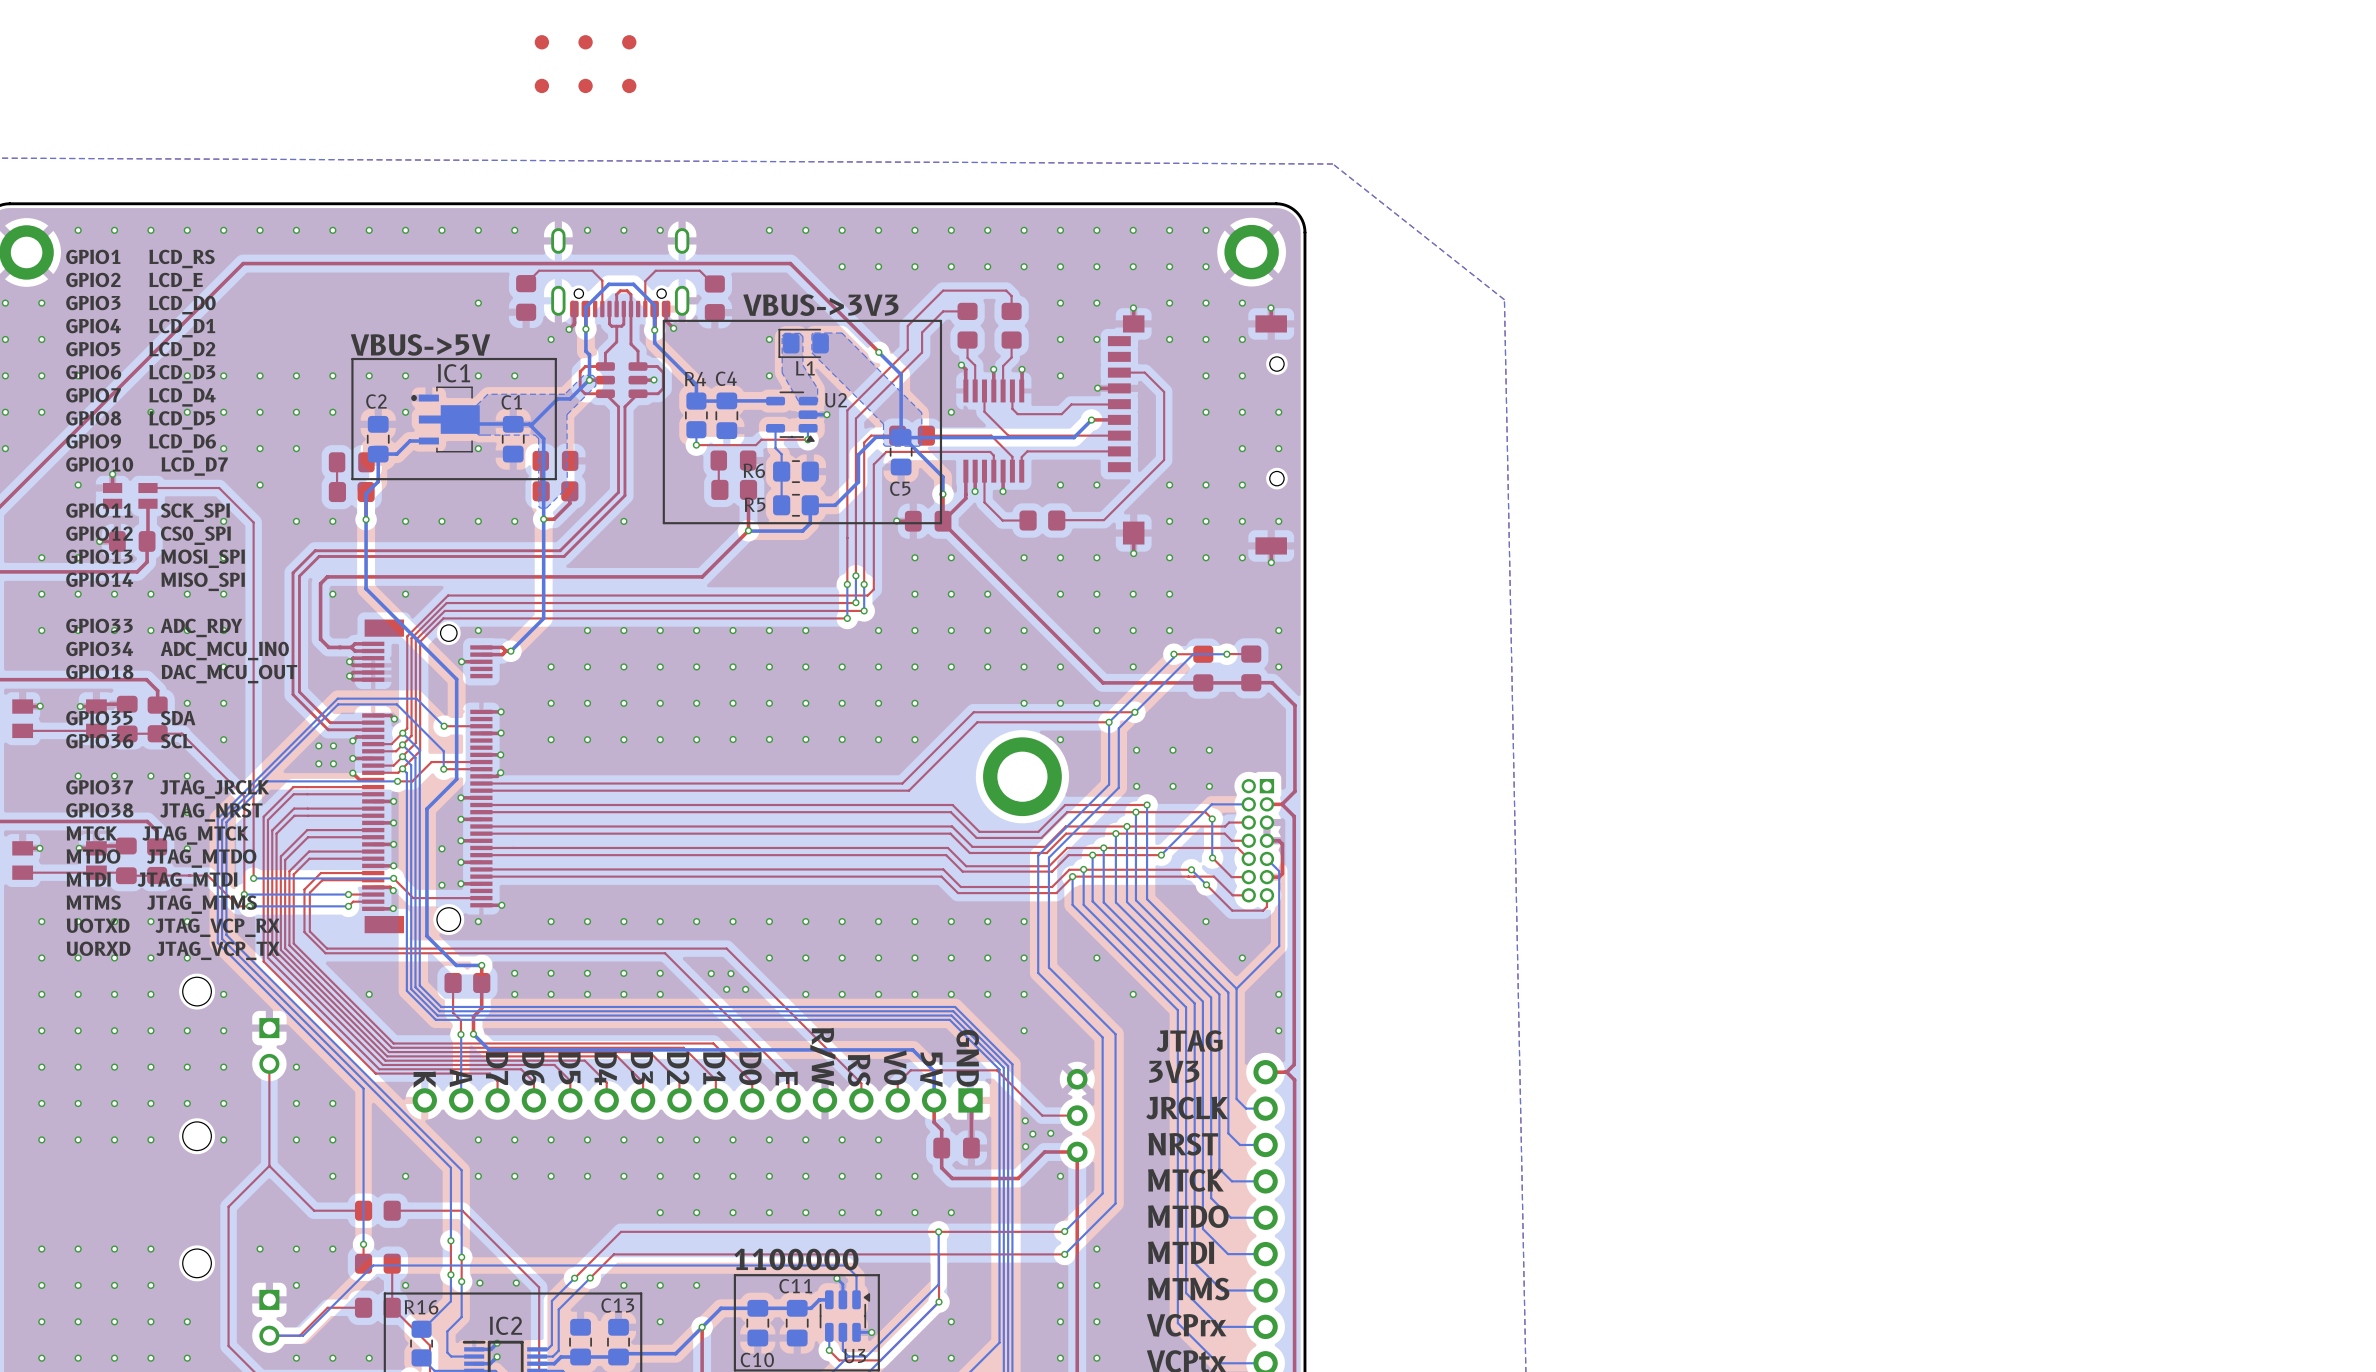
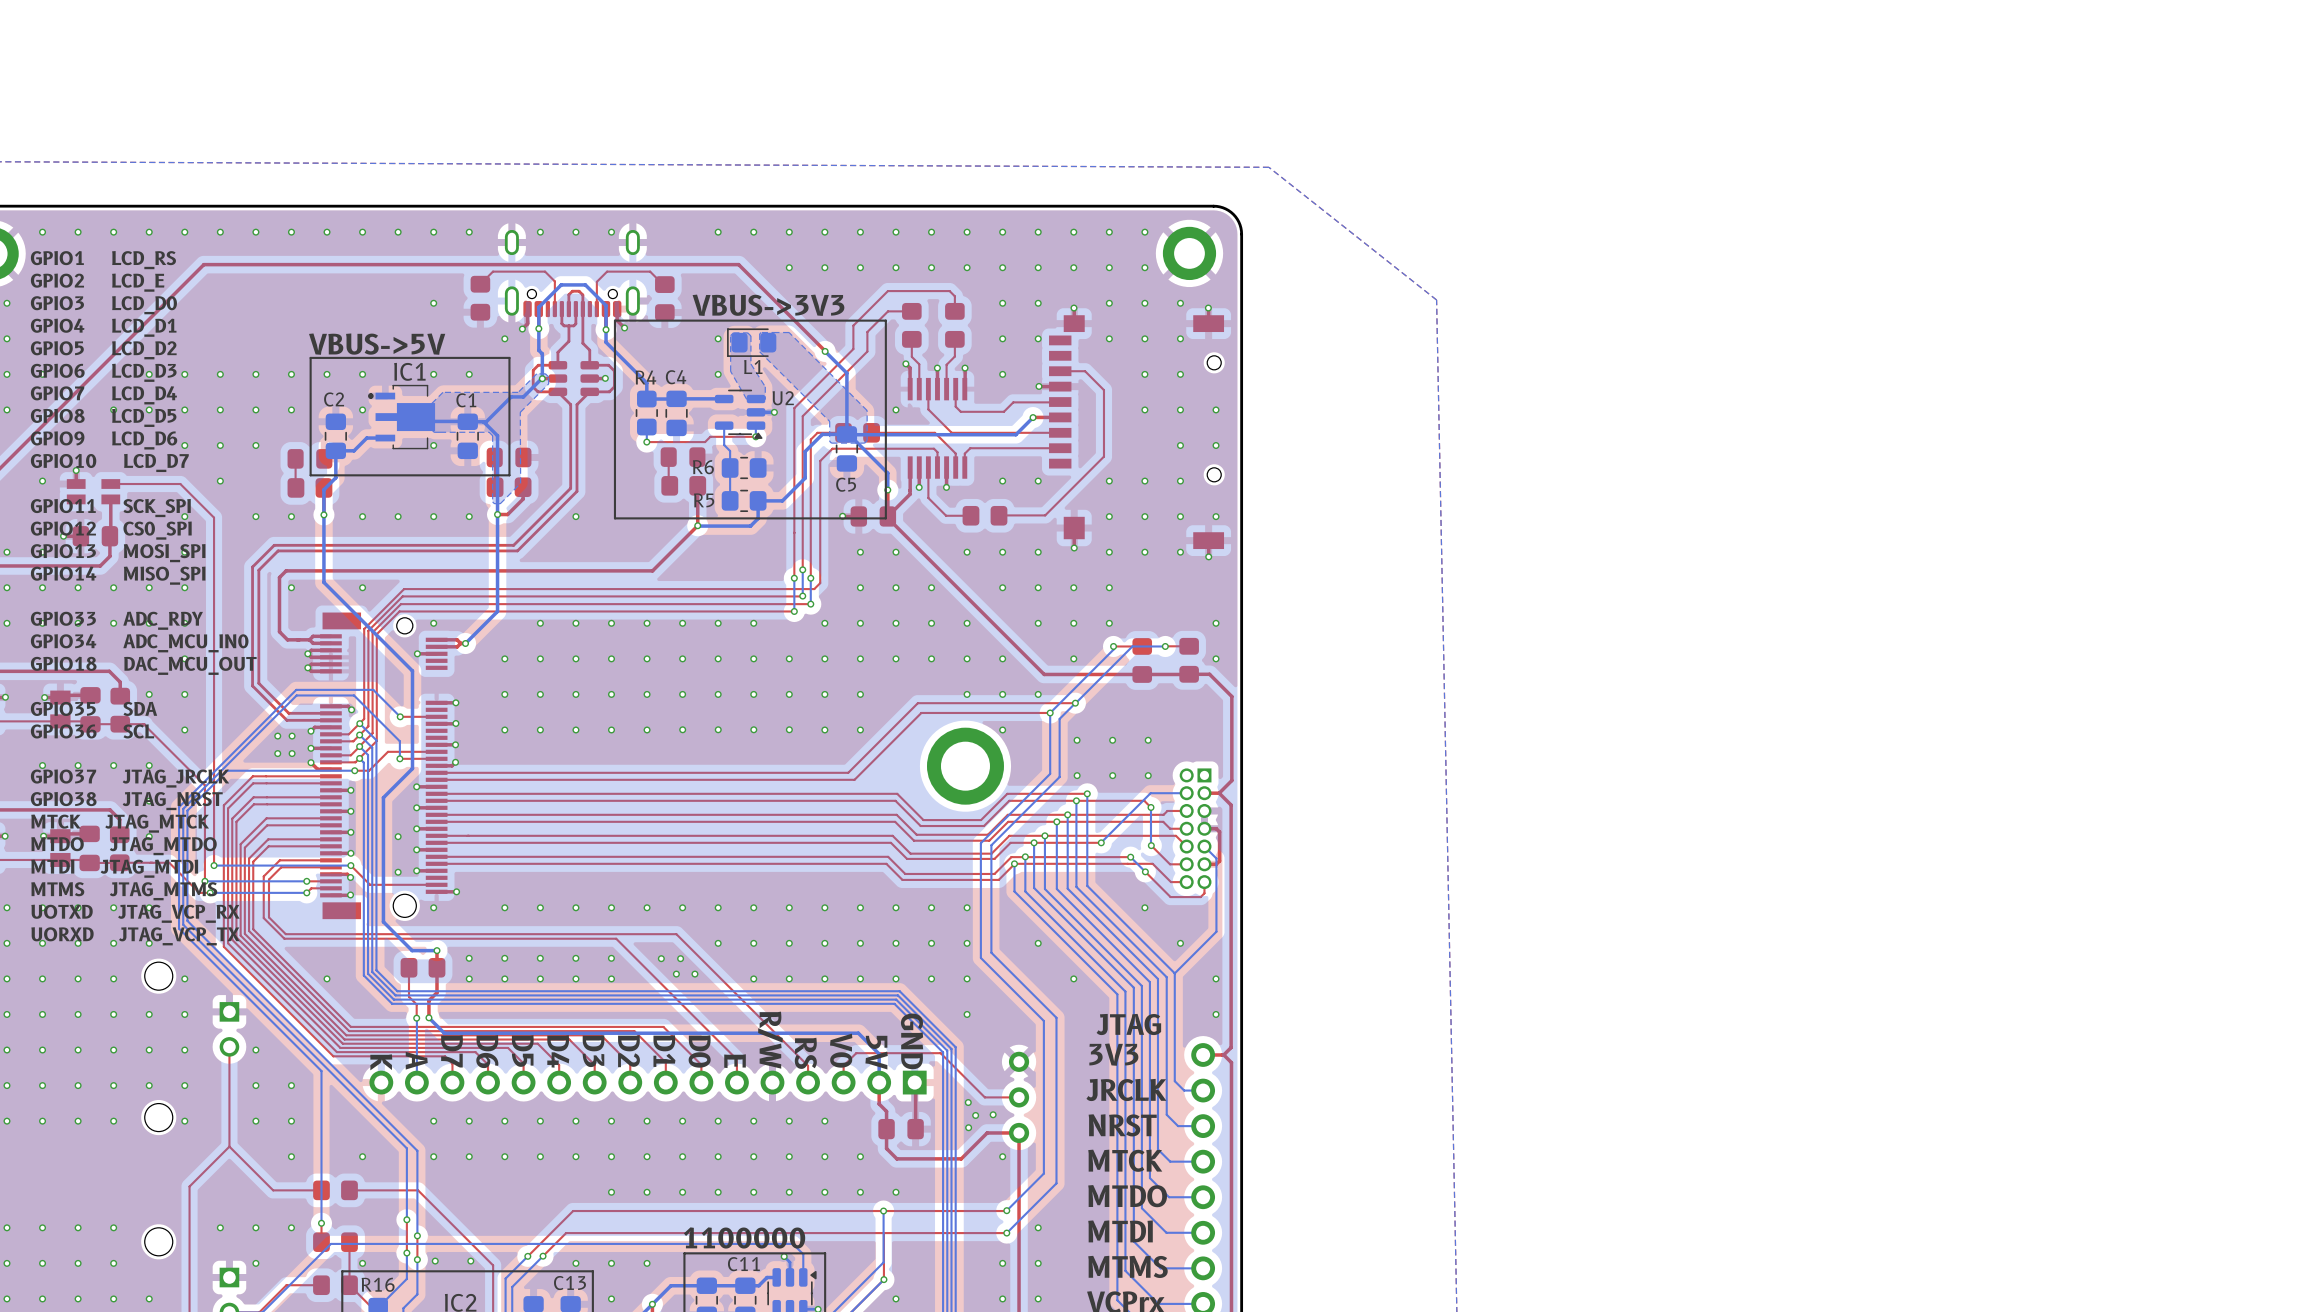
part: (541, 42) -> none
part: (585, 42) -> none
part: (629, 42) -> none
part: (541, 85) -> none
part: (585, 85) -> none
part: (629, 85) -> none

